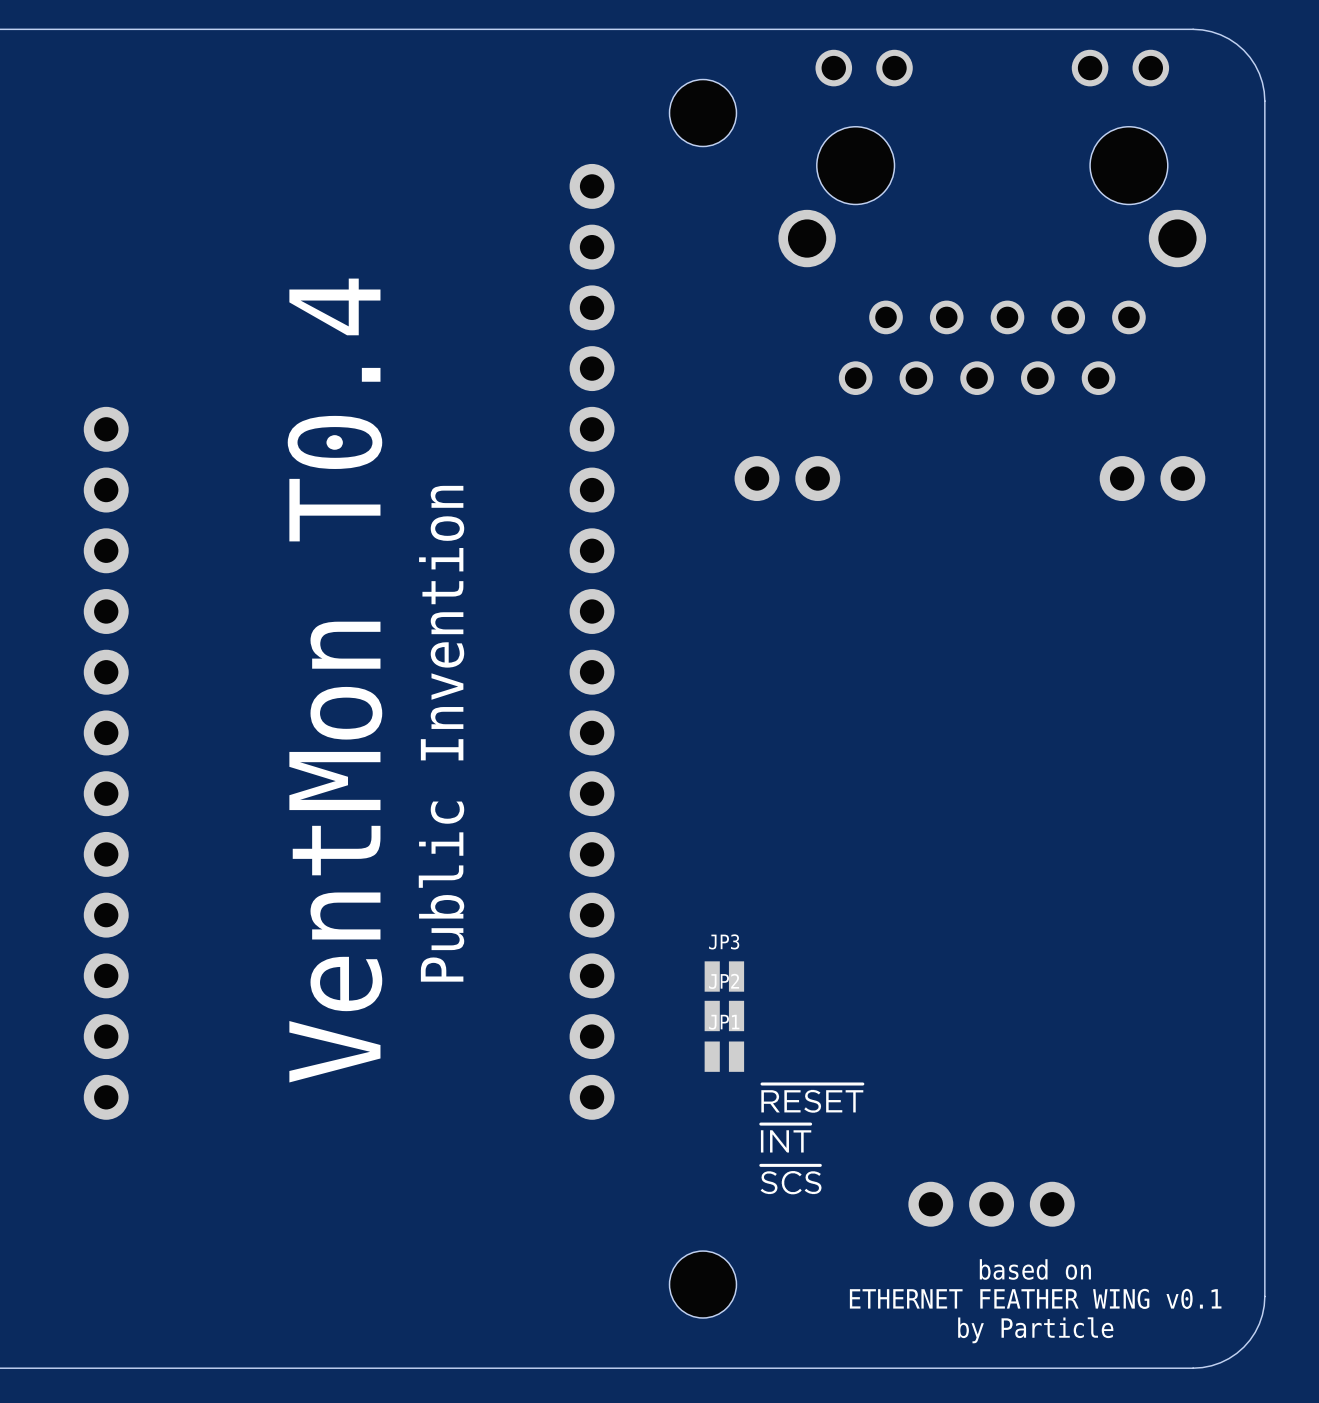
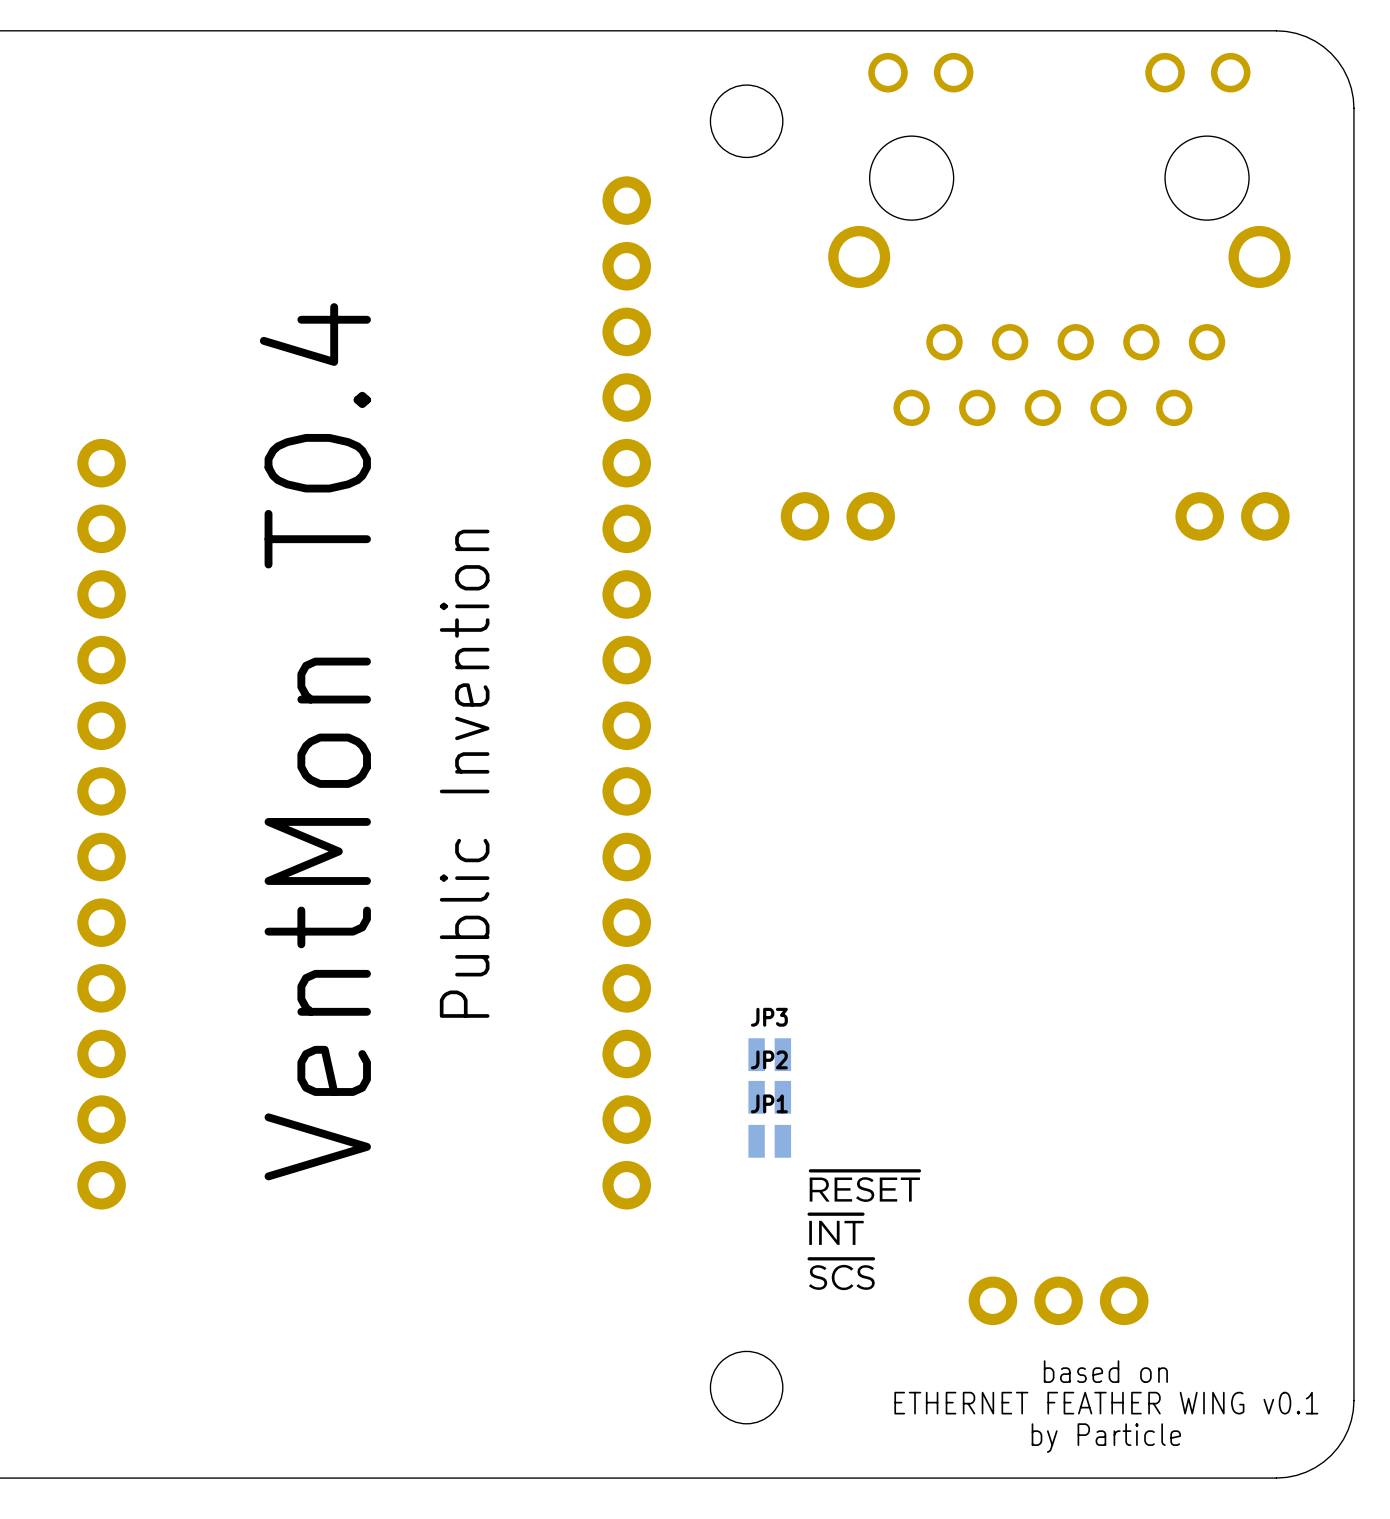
text position: VentMon T0.4 (334, 680) -> VentMon T0.4 (315, 741)

